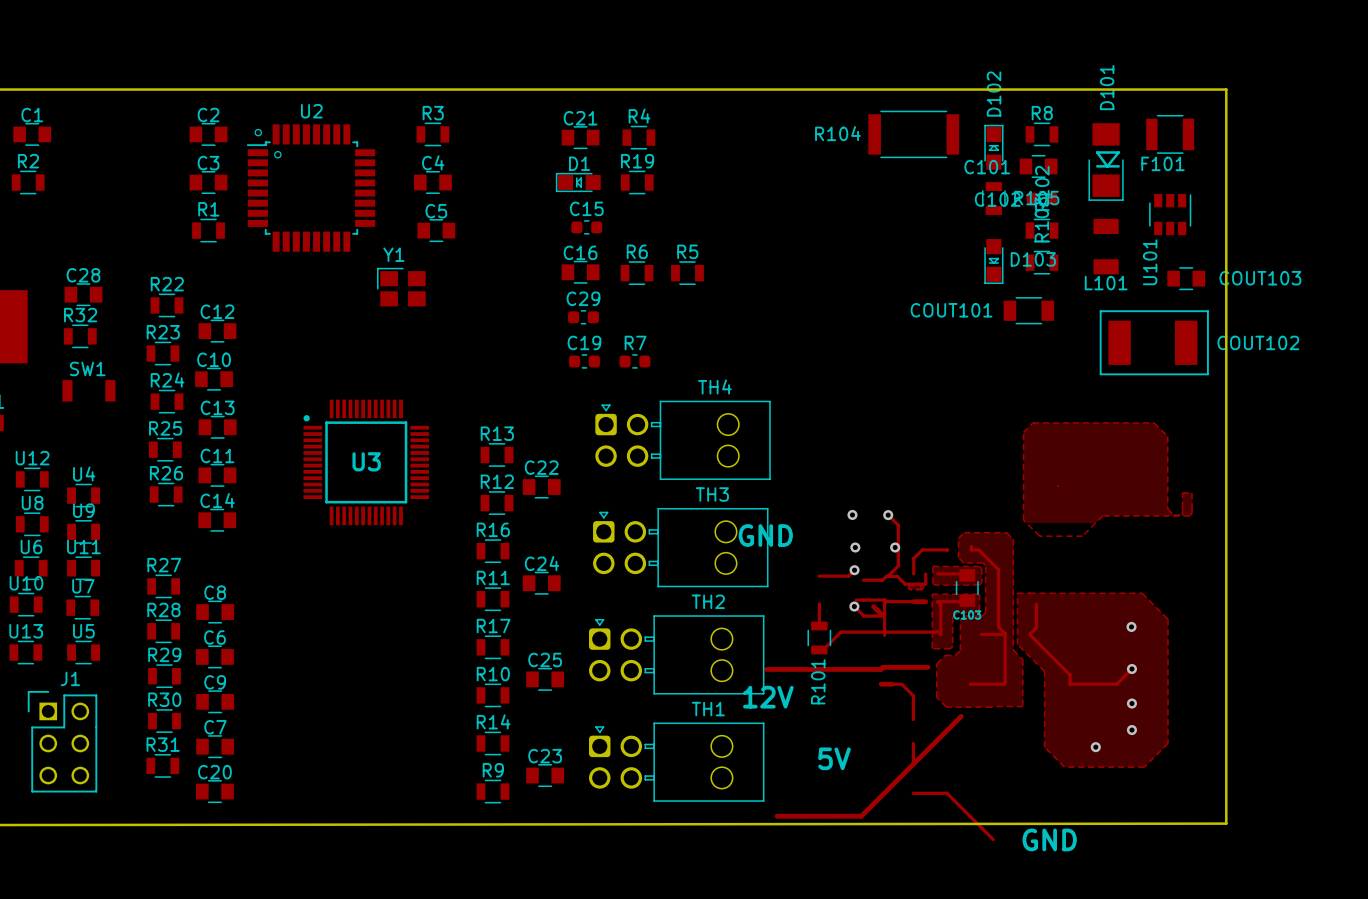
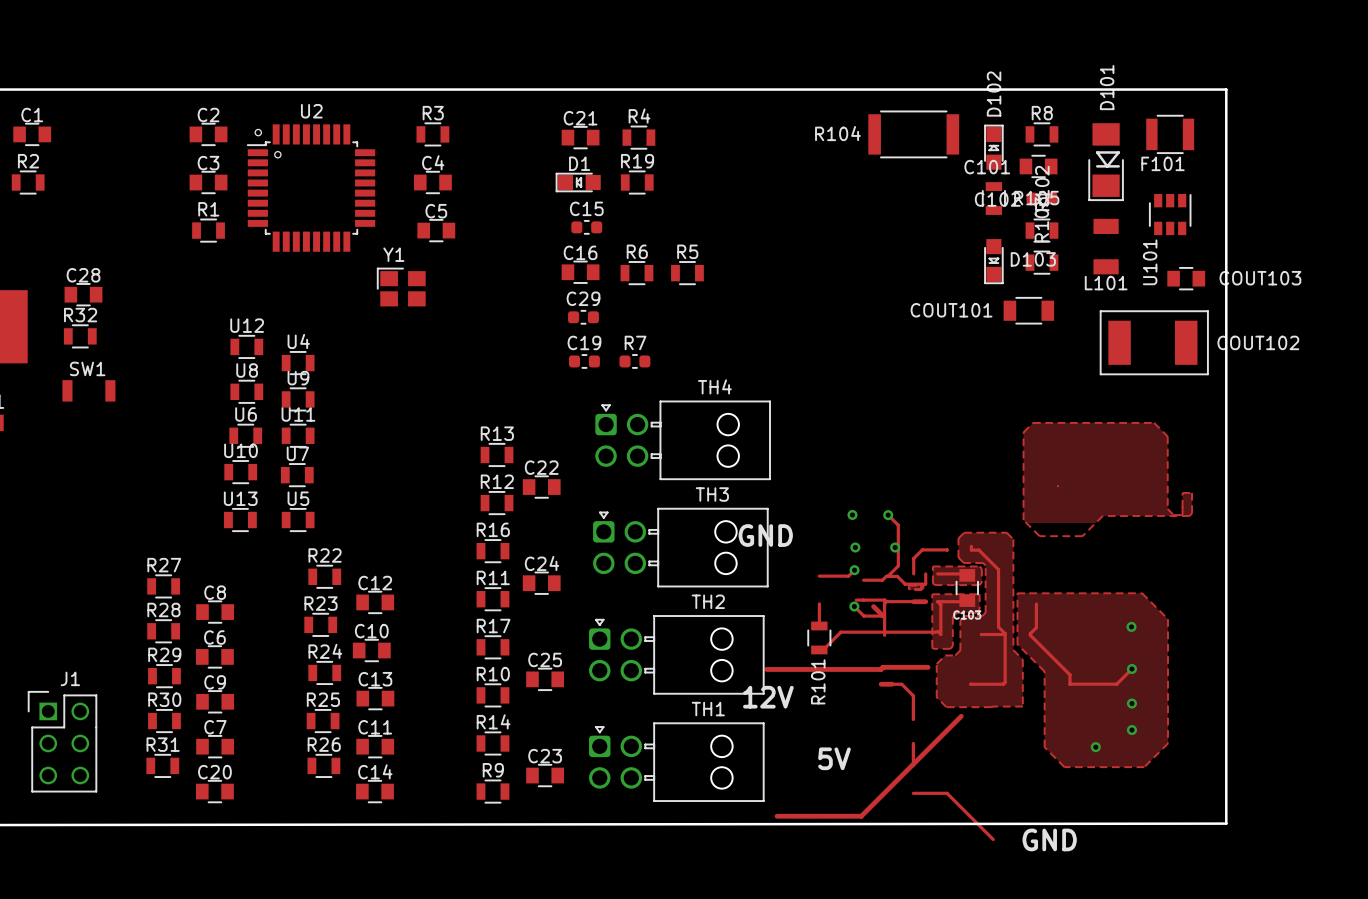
R22 position: (167, 305) -> (324, 576)
C12 position: (217, 331) -> (375, 602)
R23 position: (162, 353) -> (320, 624)
C10 position: (214, 379) -> (371, 650)
R24 position: (167, 401) -> (324, 672)
C13 position: (217, 427) -> (375, 698)
R25 position: (165, 449) -> (323, 721)
U3: (366, 462) -> none
C11 position: (217, 475) -> (375, 746)
U12 position: (32, 479) -> (246, 346)
R26 position: (166, 494) -> (323, 765)
U4 position: (83, 495) -> (298, 363)
C14 position: (217, 520) -> (375, 791)
U8 position: (32, 524) -> (246, 391)
U9 position: (83, 531) -> (298, 399)
U6 position: (31, 568) -> (245, 435)
U11 position: (83, 568) -> (298, 435)
U10 position: (26, 604) -> (240, 472)
U7 position: (82, 607) -> (297, 475)
U13 position: (25, 652) -> (240, 520)
U5 position: (83, 652) -> (298, 520)

